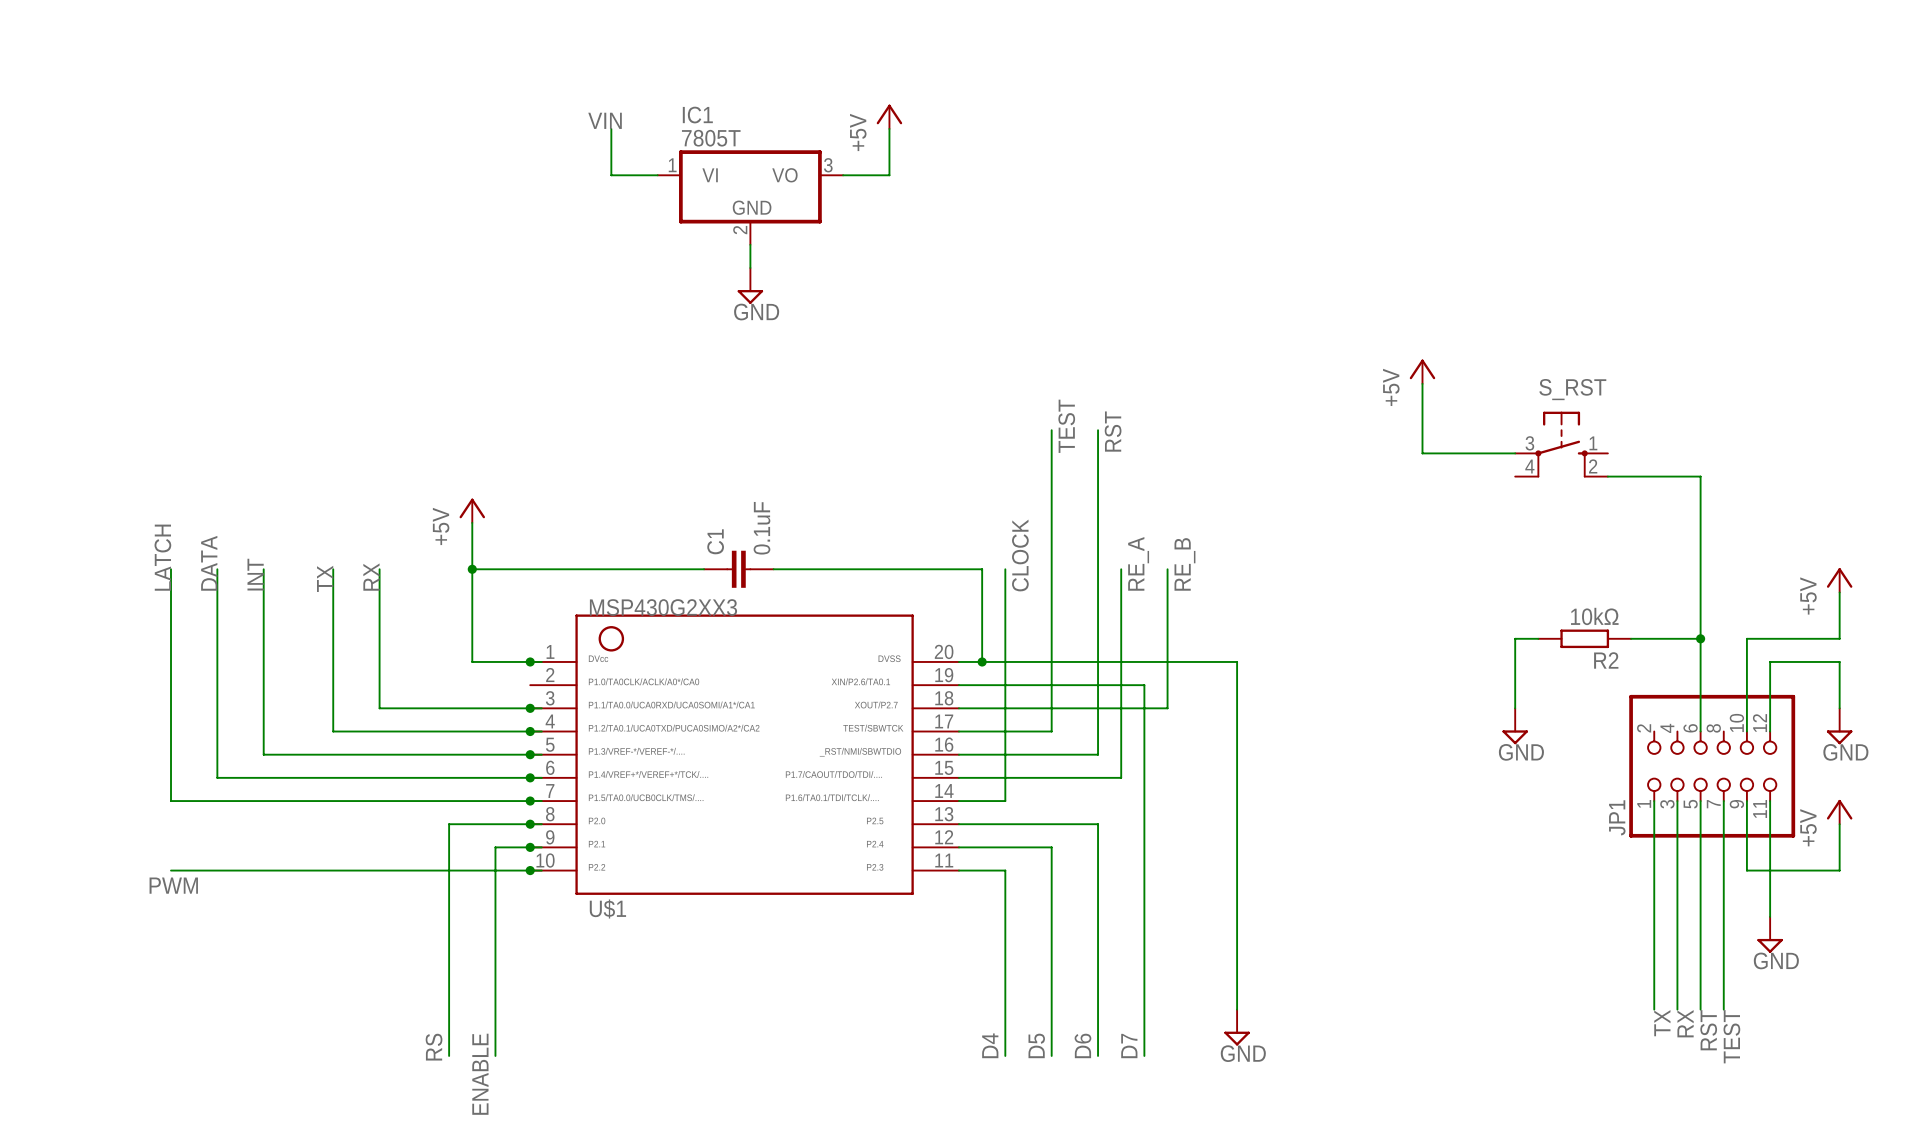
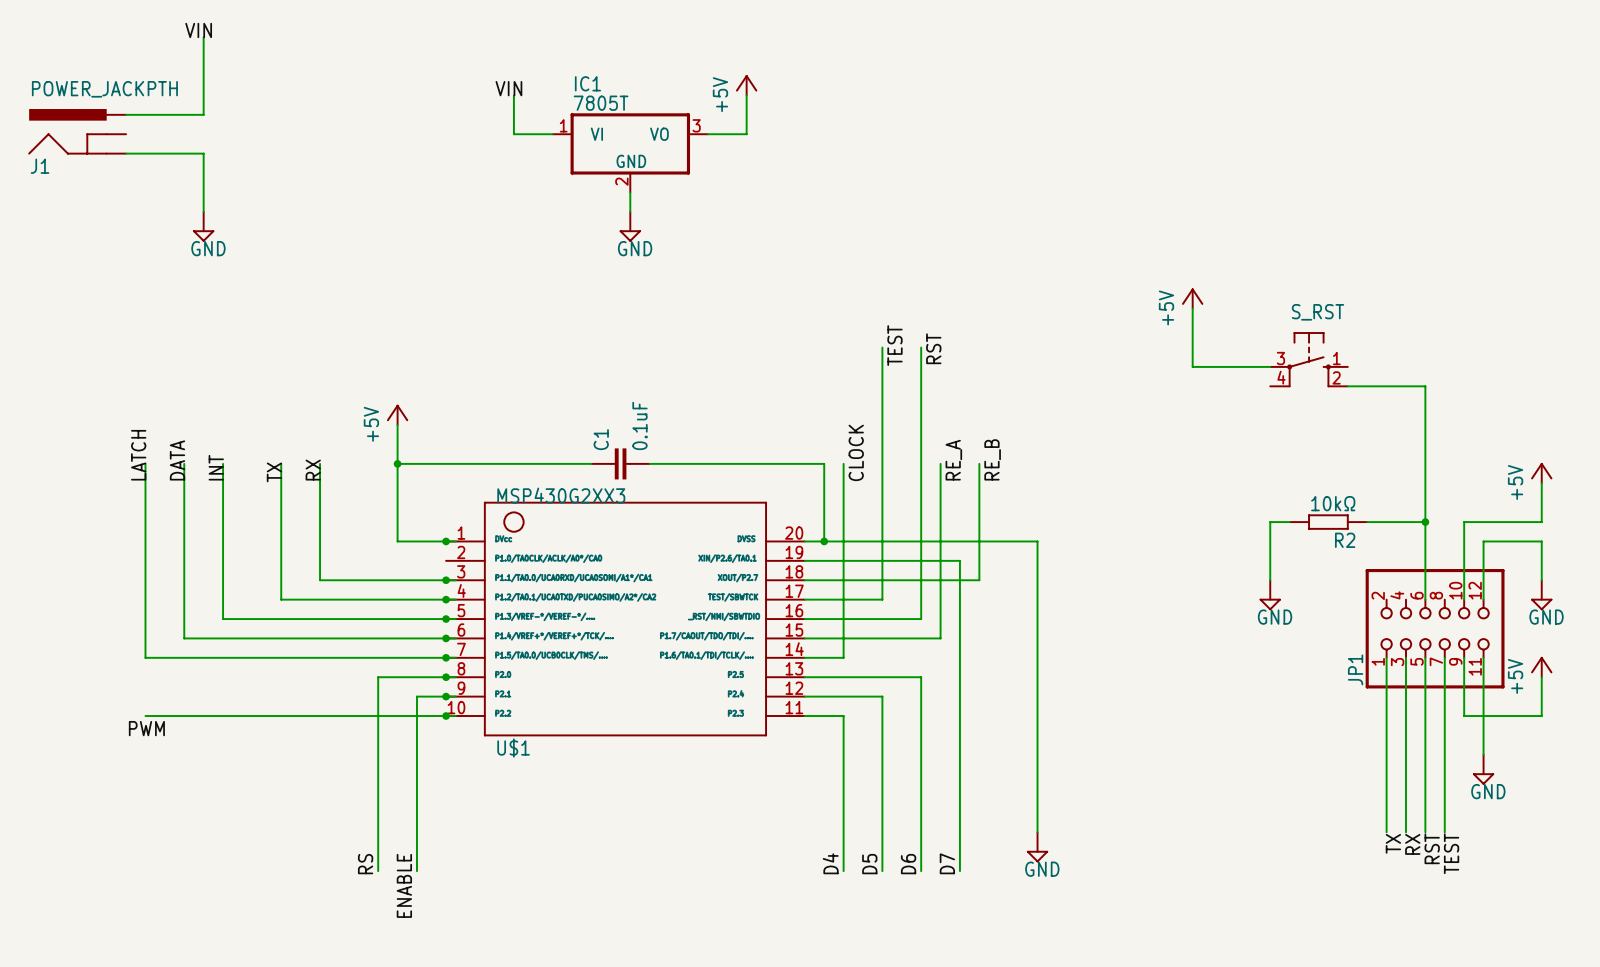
label: none -> VIN (198, 30)
wire: none -> (203, 37) (203, 114) (126, 114)
J1: none -> POWER_JACKPTH (77, 131)
wire: none -> (126, 153) (203, 153) (203, 211)
power symbol: none -> GND (203, 226)

